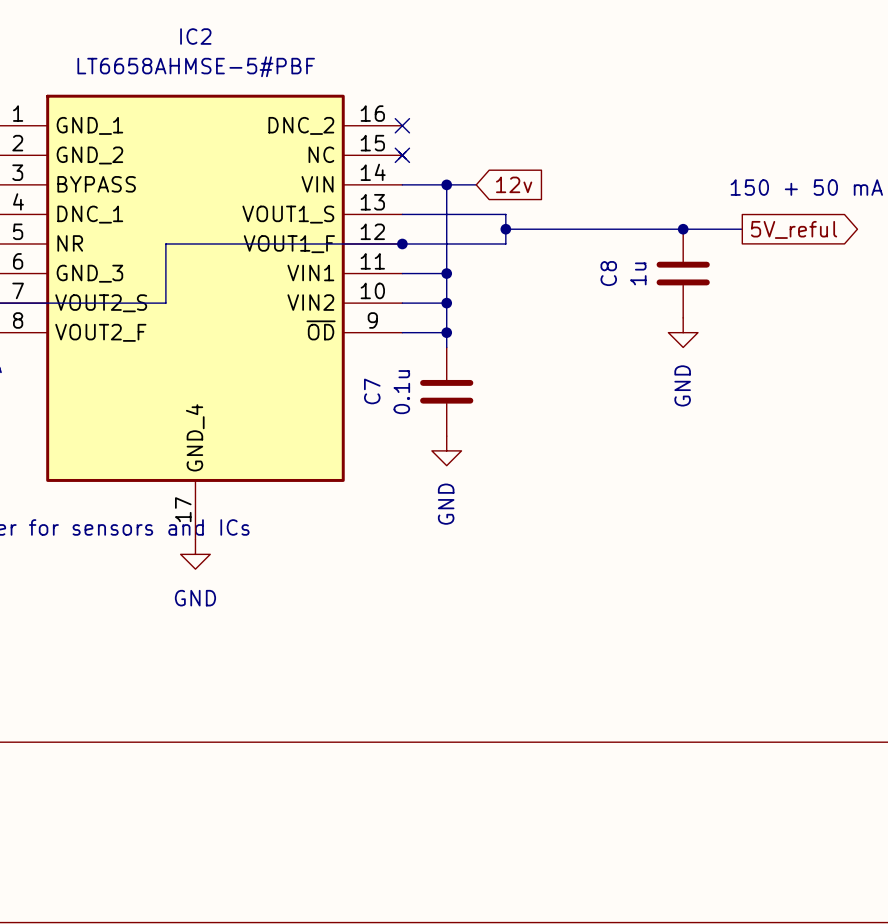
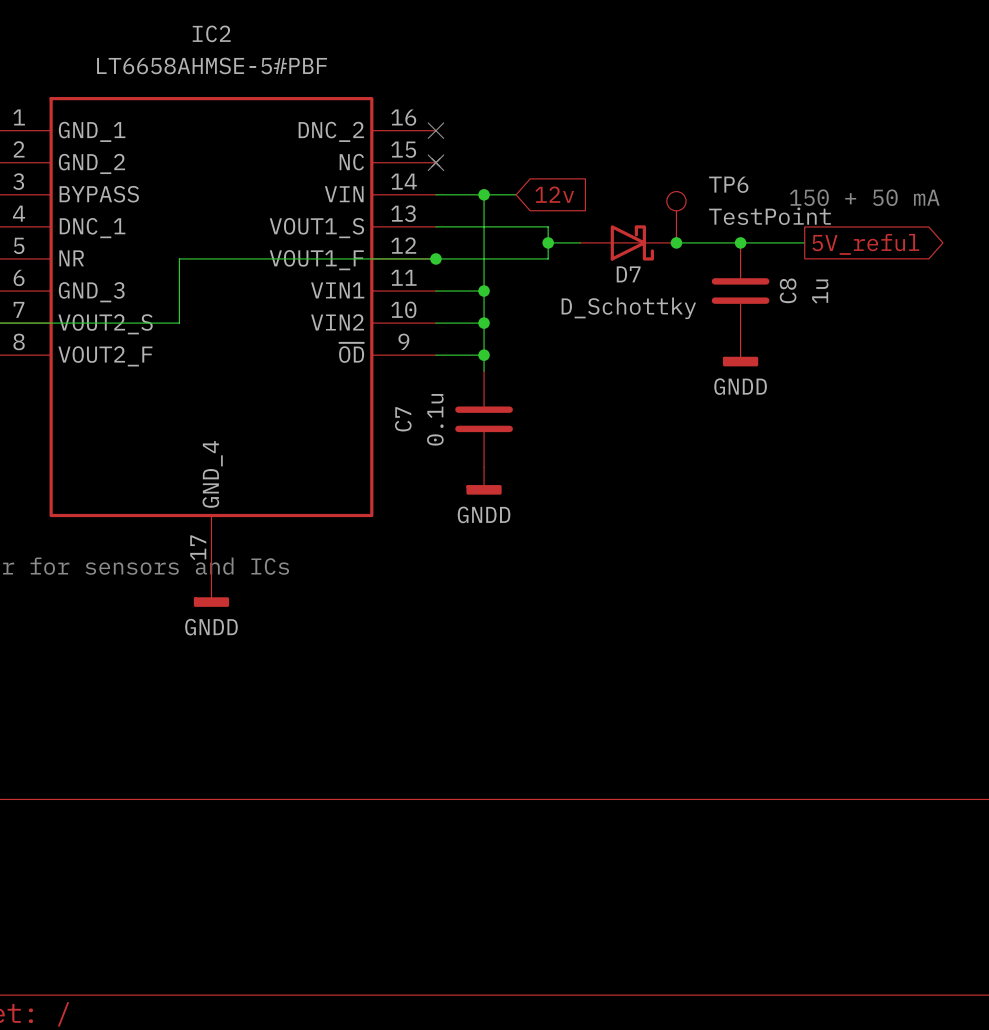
TP6: none -> TestPoint (676, 217)
D7: none -> D_Schottky (628, 242)
junction: none -> (676, 242)
C8 name position: C8 (608, 273) -> C8 (788, 290)
C8 value position: 1u (638, 273) -> 1u (820, 291)
power symbol: GND (683, 332) -> GNDD (740, 352)
power symbol: GND (446, 450) -> GNDD (484, 481)
power symbol: GND (195, 554) -> GNDD (211, 593)

